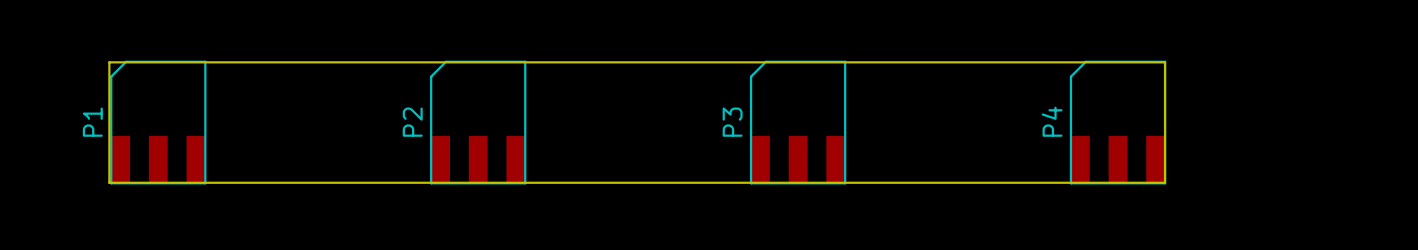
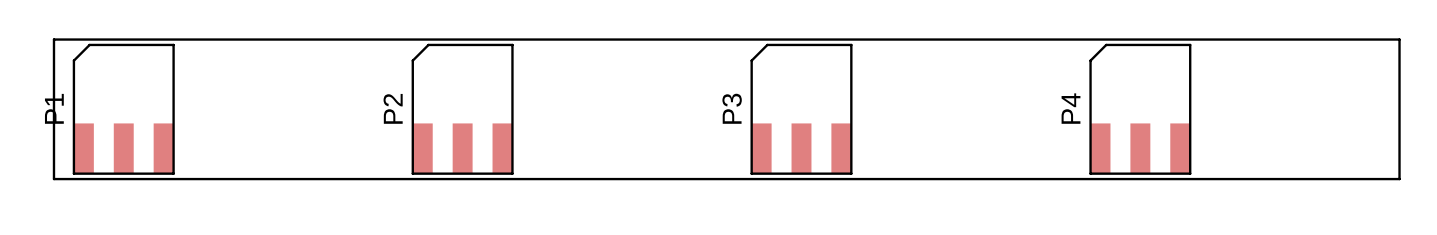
board edge: (109, 62) (1165, 62) (1165, 182) (109, 182) (109, 62) -> (53, 39) (53, 179) (1399, 179) (1399, 39) (53, 39)

